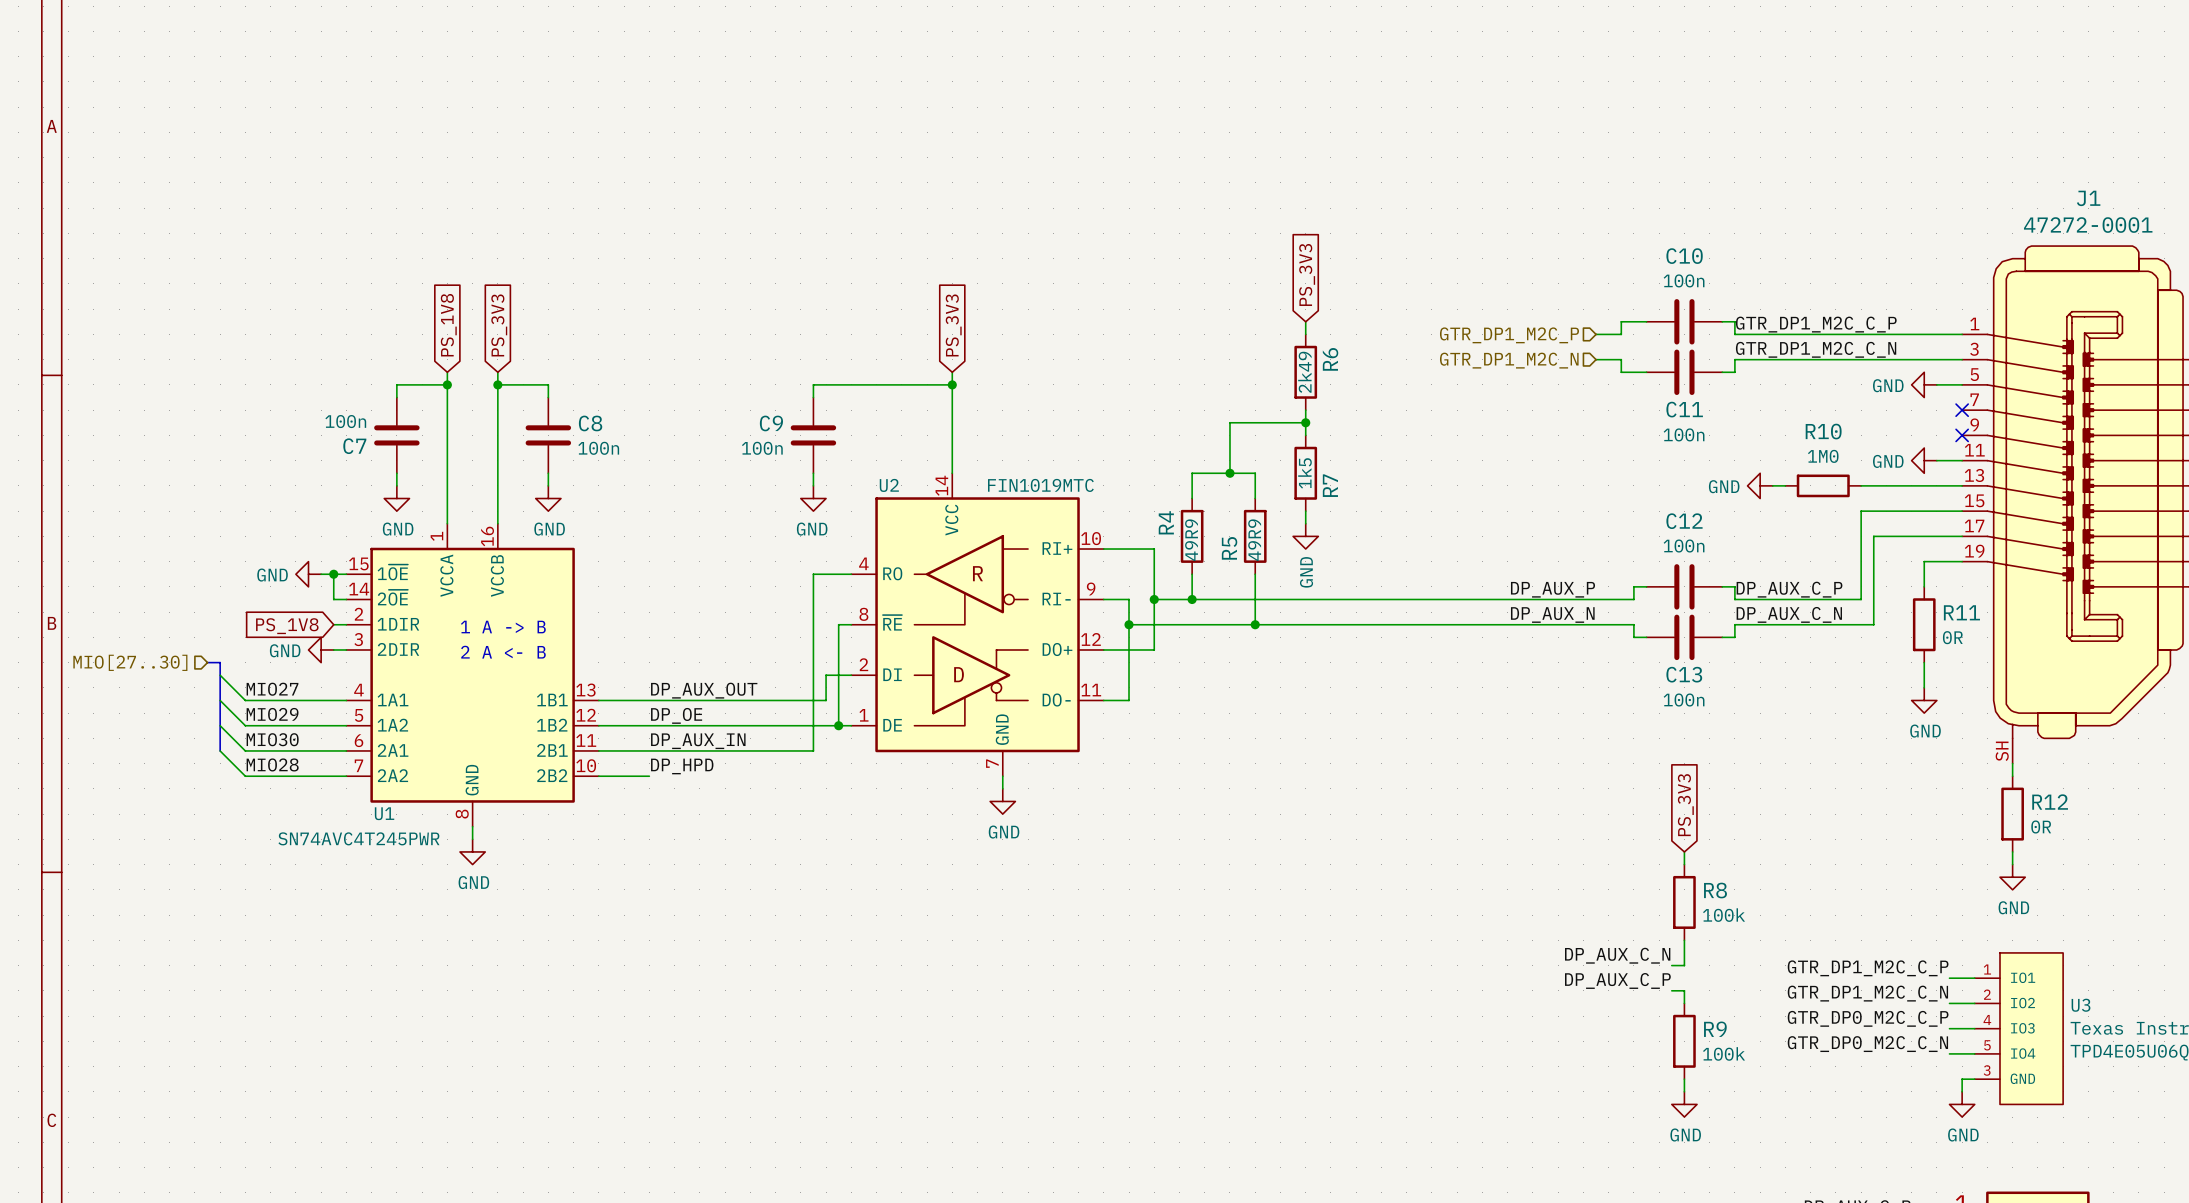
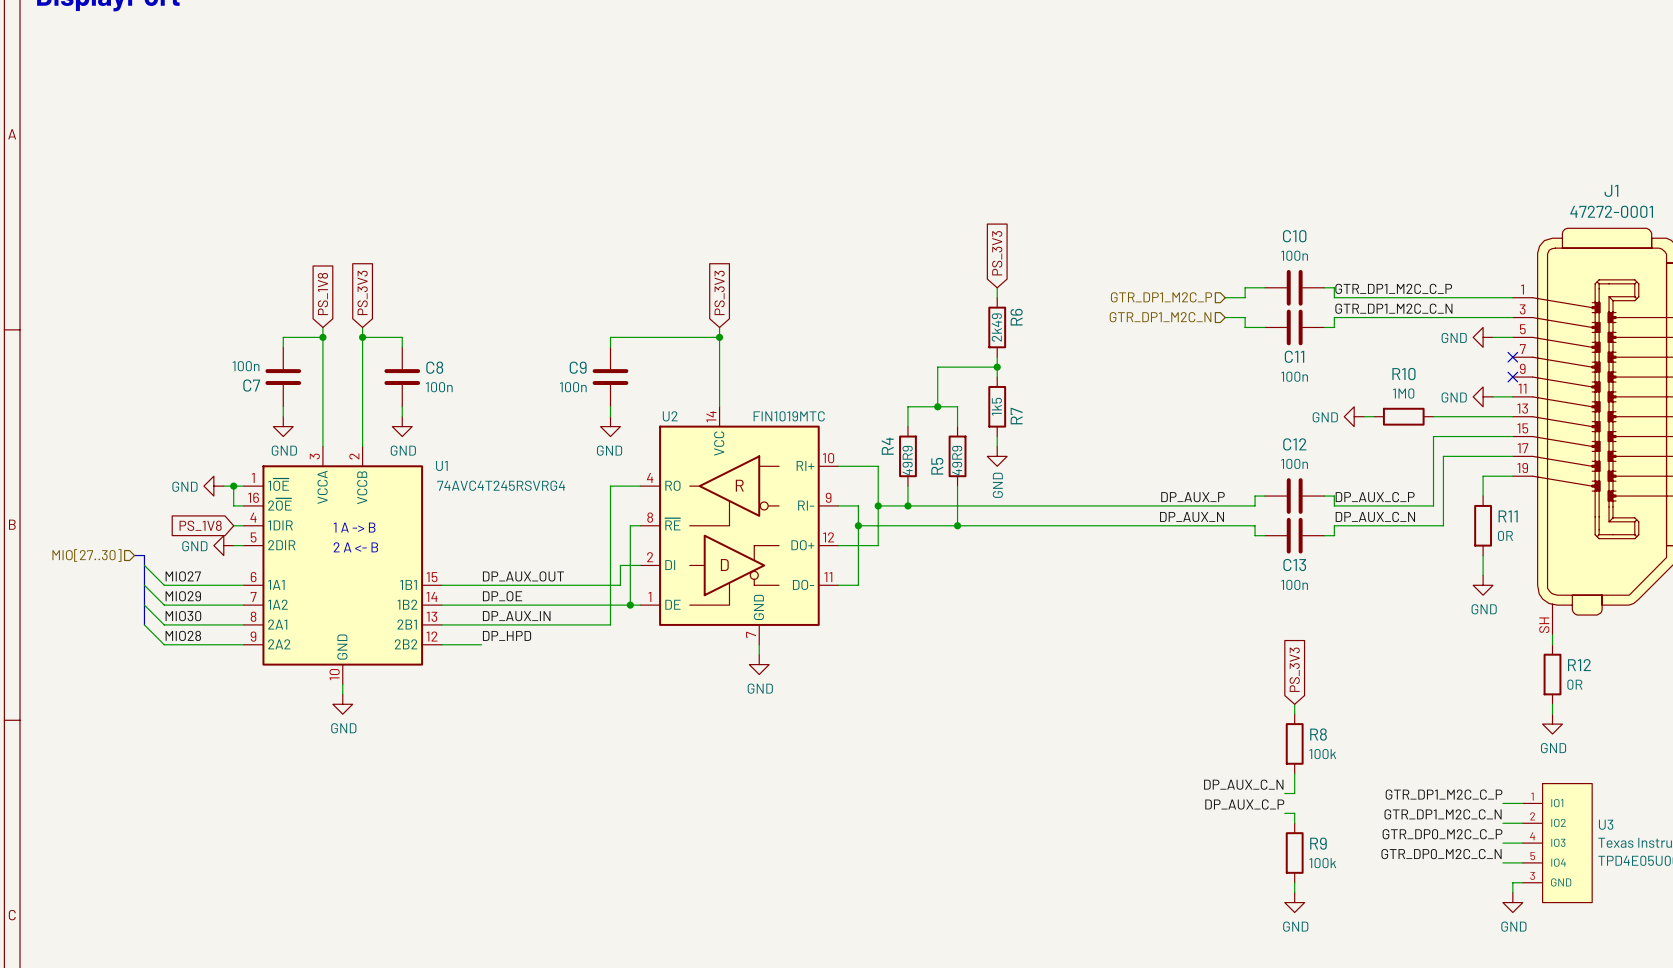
U1 symbol: [346, 523, 599, 827] -> [243, 446, 442, 685]
U1 name position: U1 (384, 813) -> U1 (441, 465)
U1 value: SN74AVC4T245PWR (358, 838) -> 74AVC4T245RSVRG4 (501, 485)

